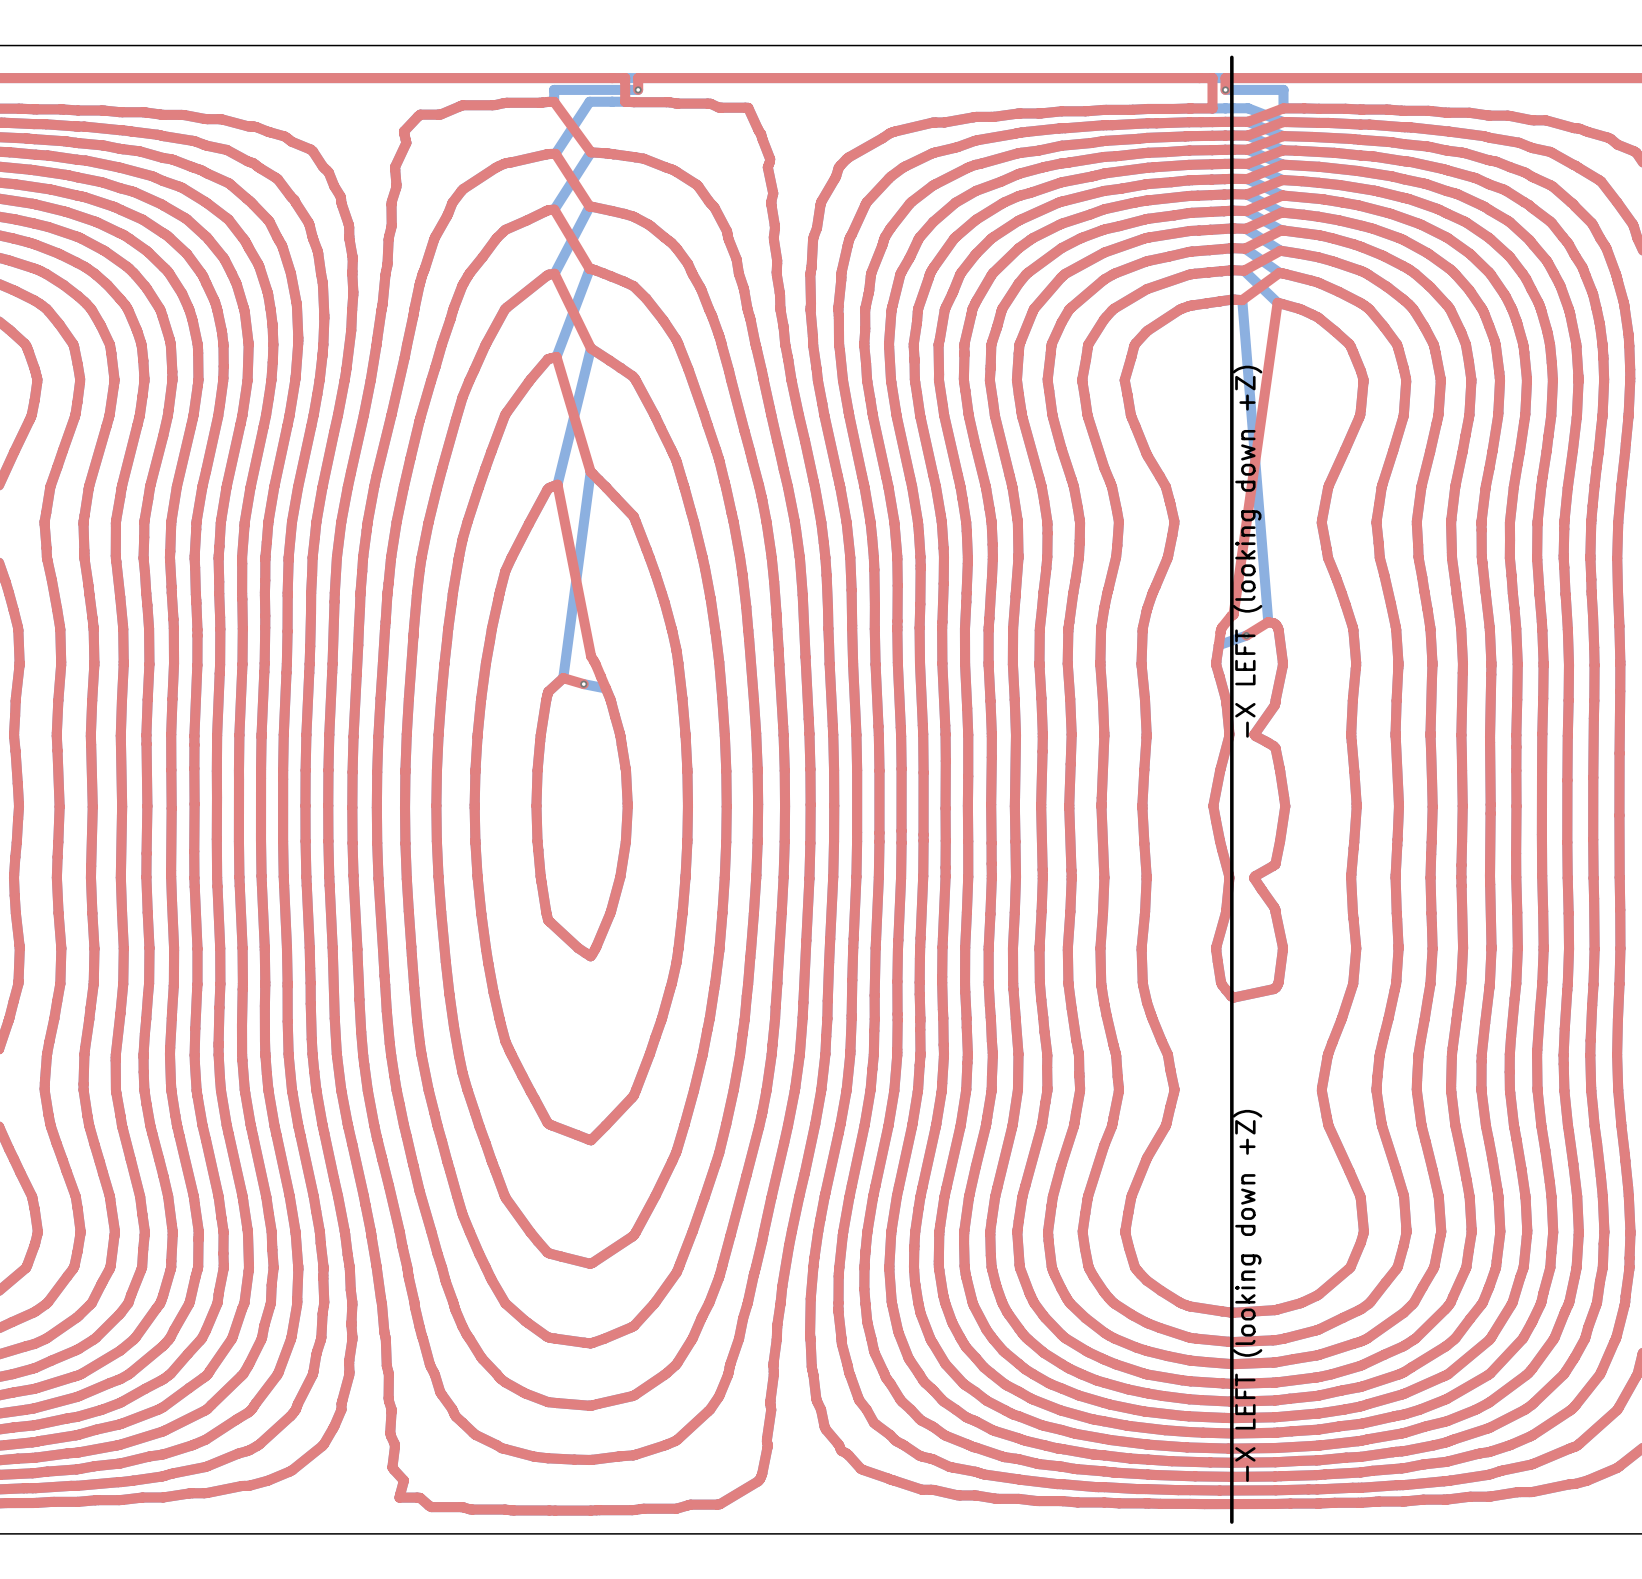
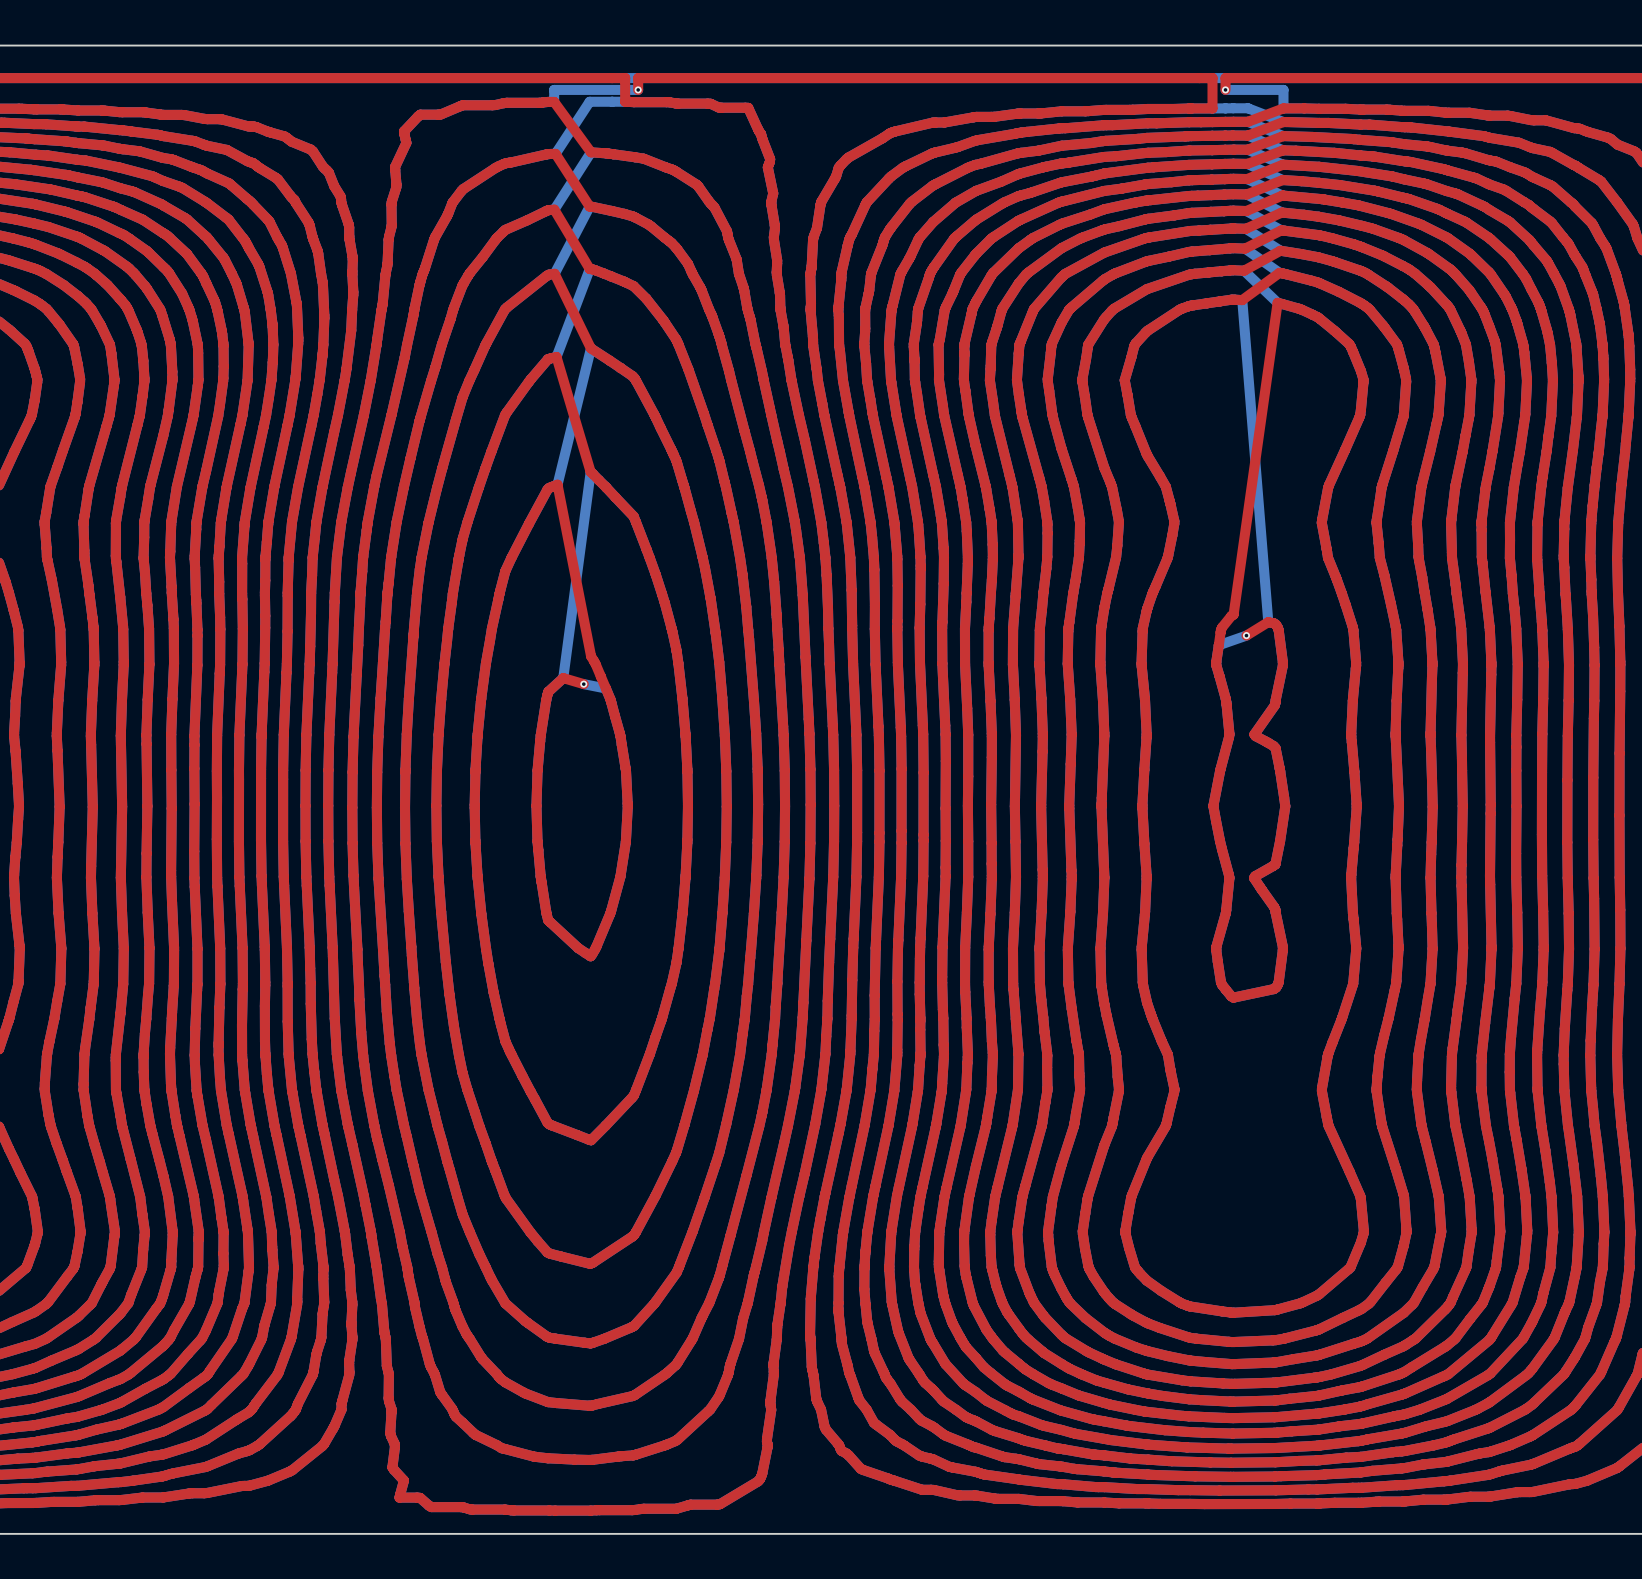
line: (1231, 57) (1231, 1522) -> none
text: -X LEFT (looking down +Z) (1247, 551) -> none
text: -X LEFT (looking down +Z) (1247, 1295) -> none

